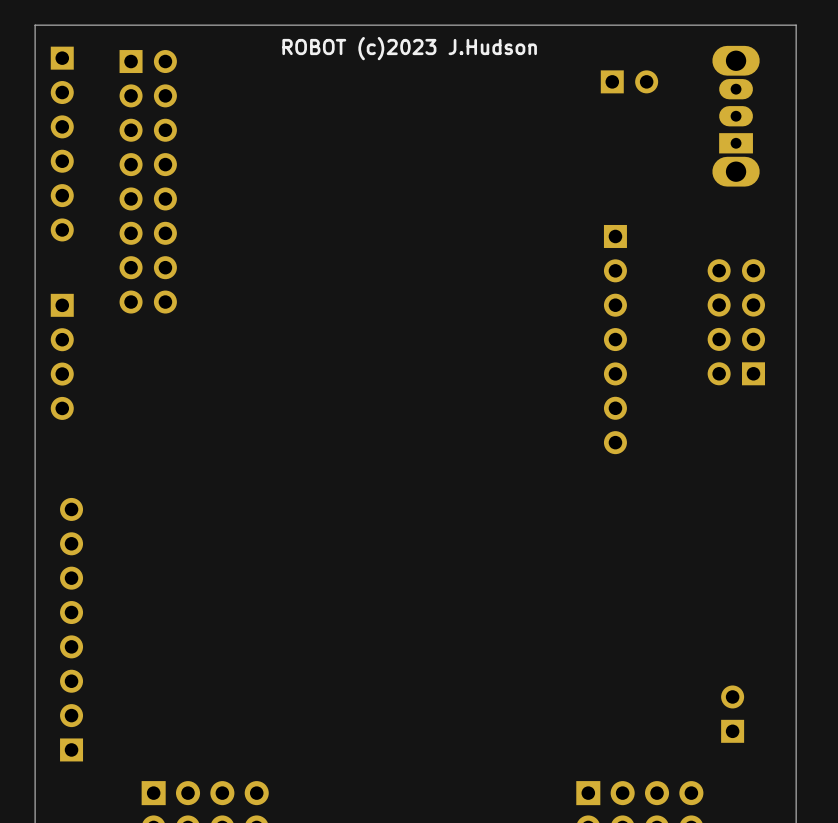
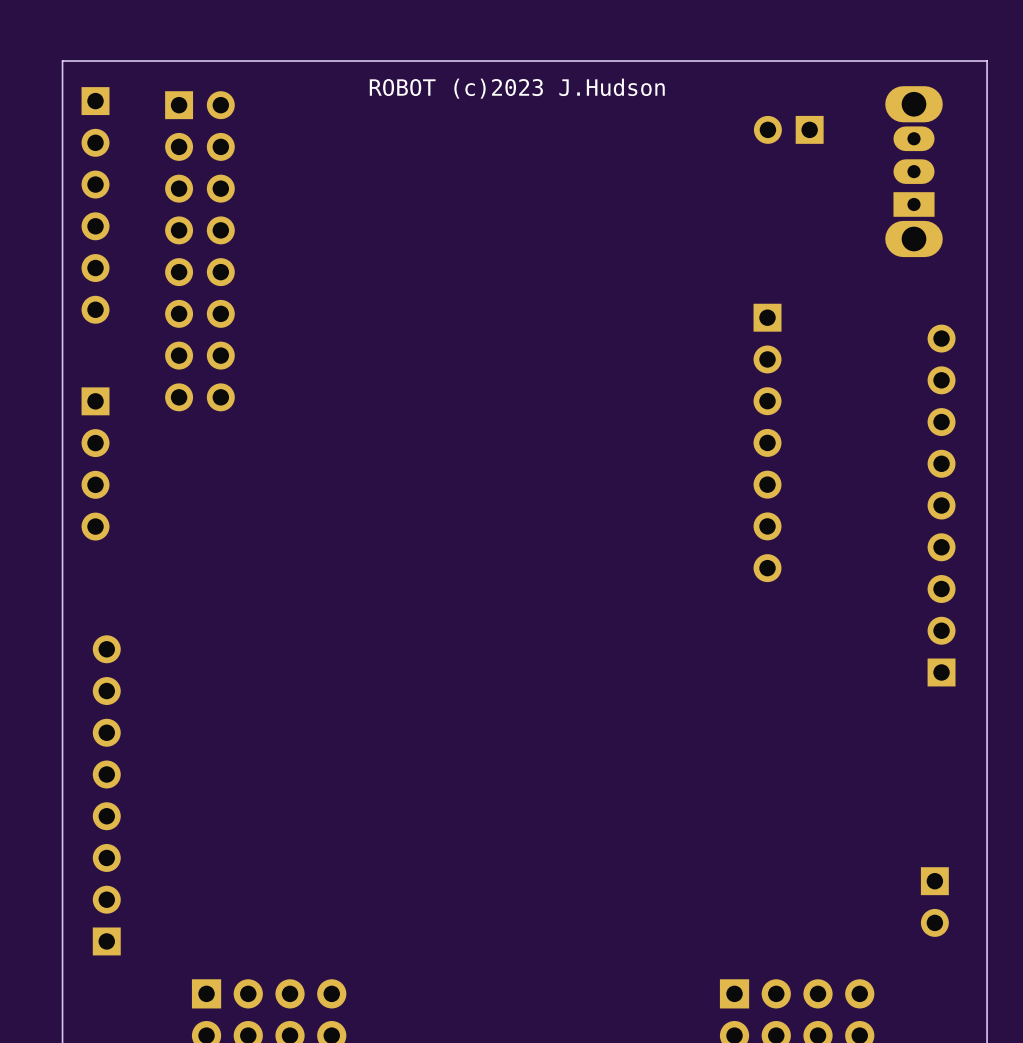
part rotation: 0° (629, 81) -> 180° (788, 129)
part: (736, 322) -> none
part: none -> (941, 505)
part rotation: 0° (732, 714) -> 180° (934, 902)

